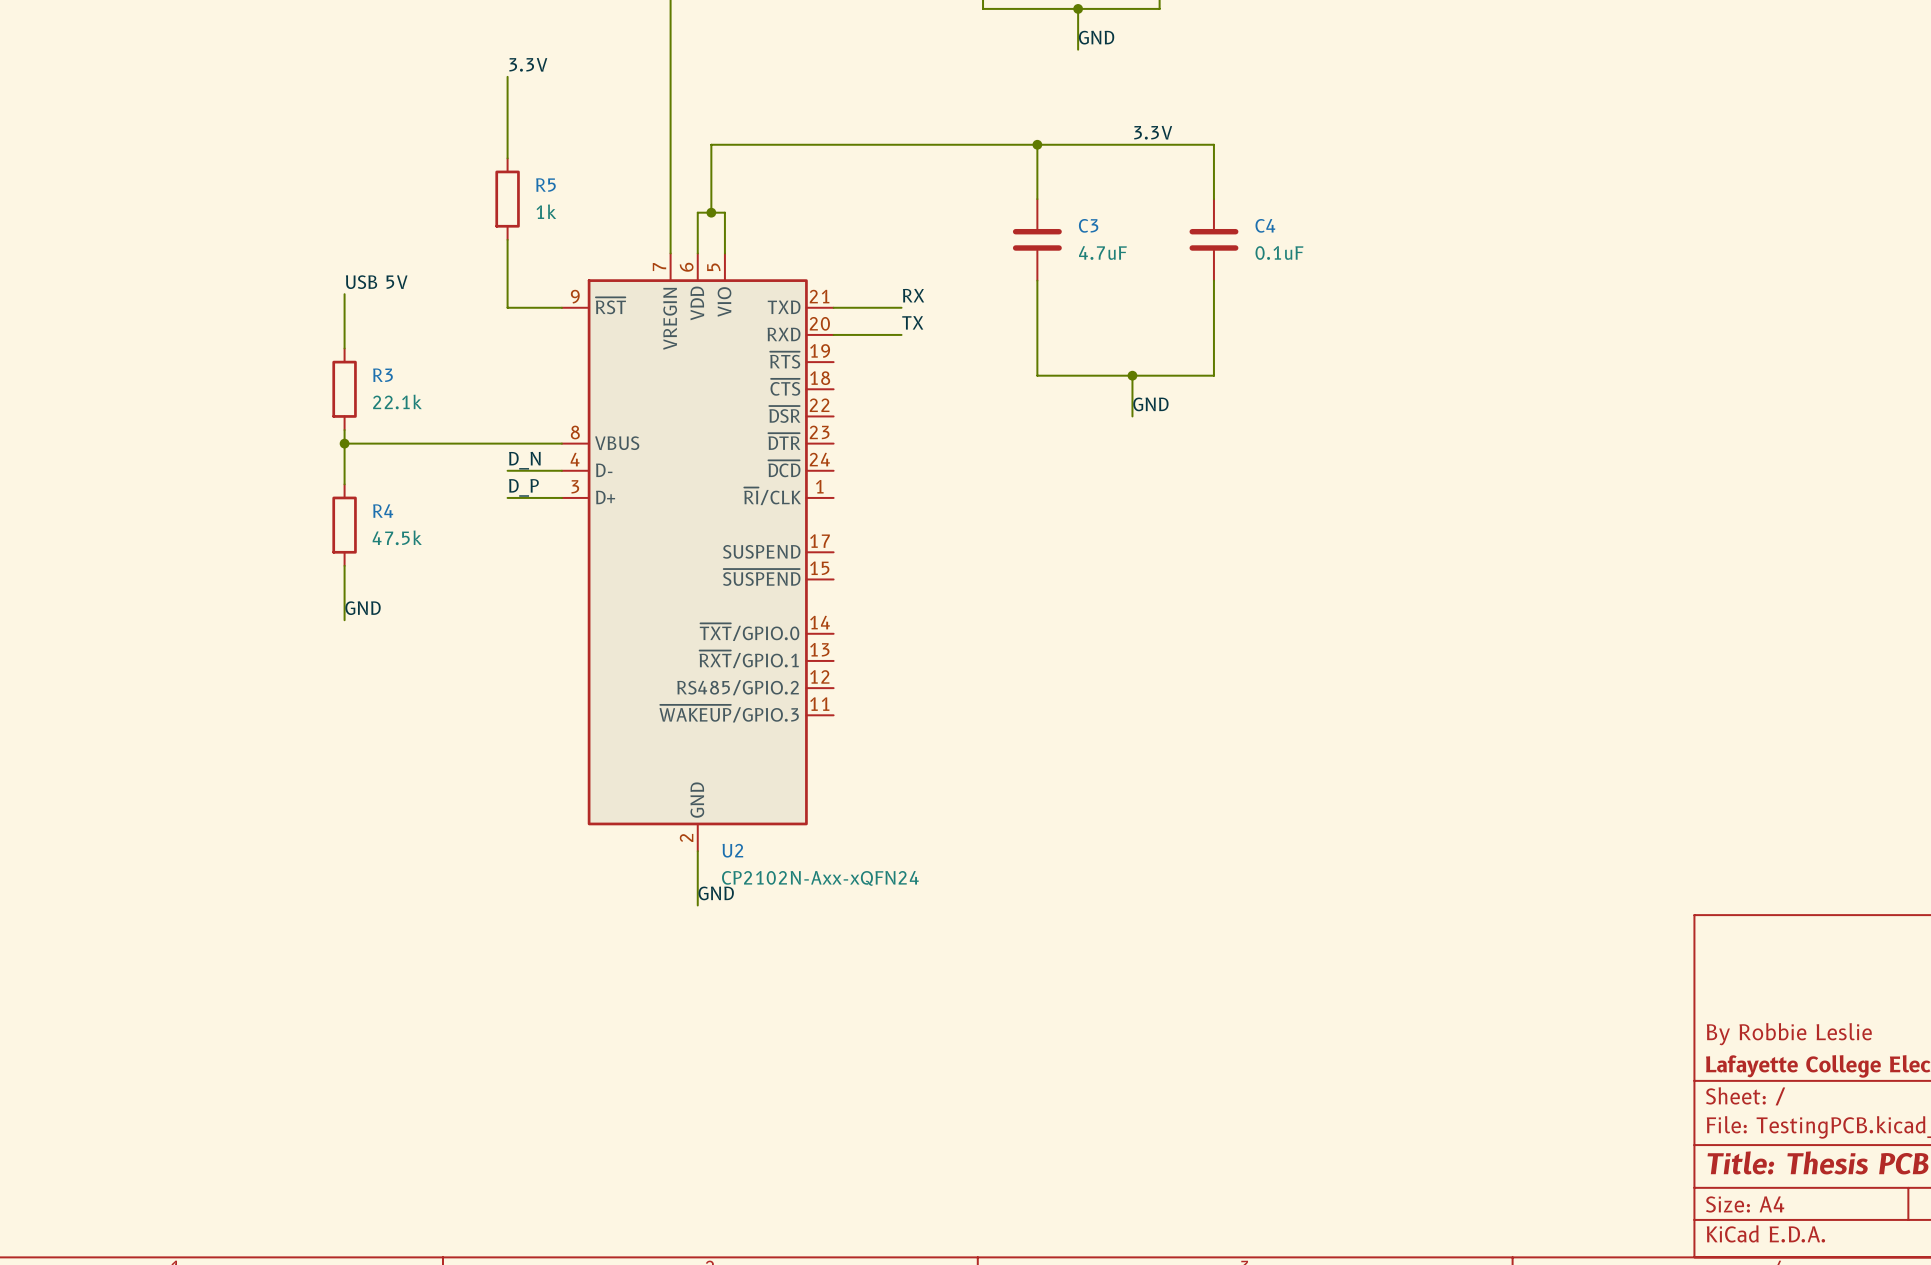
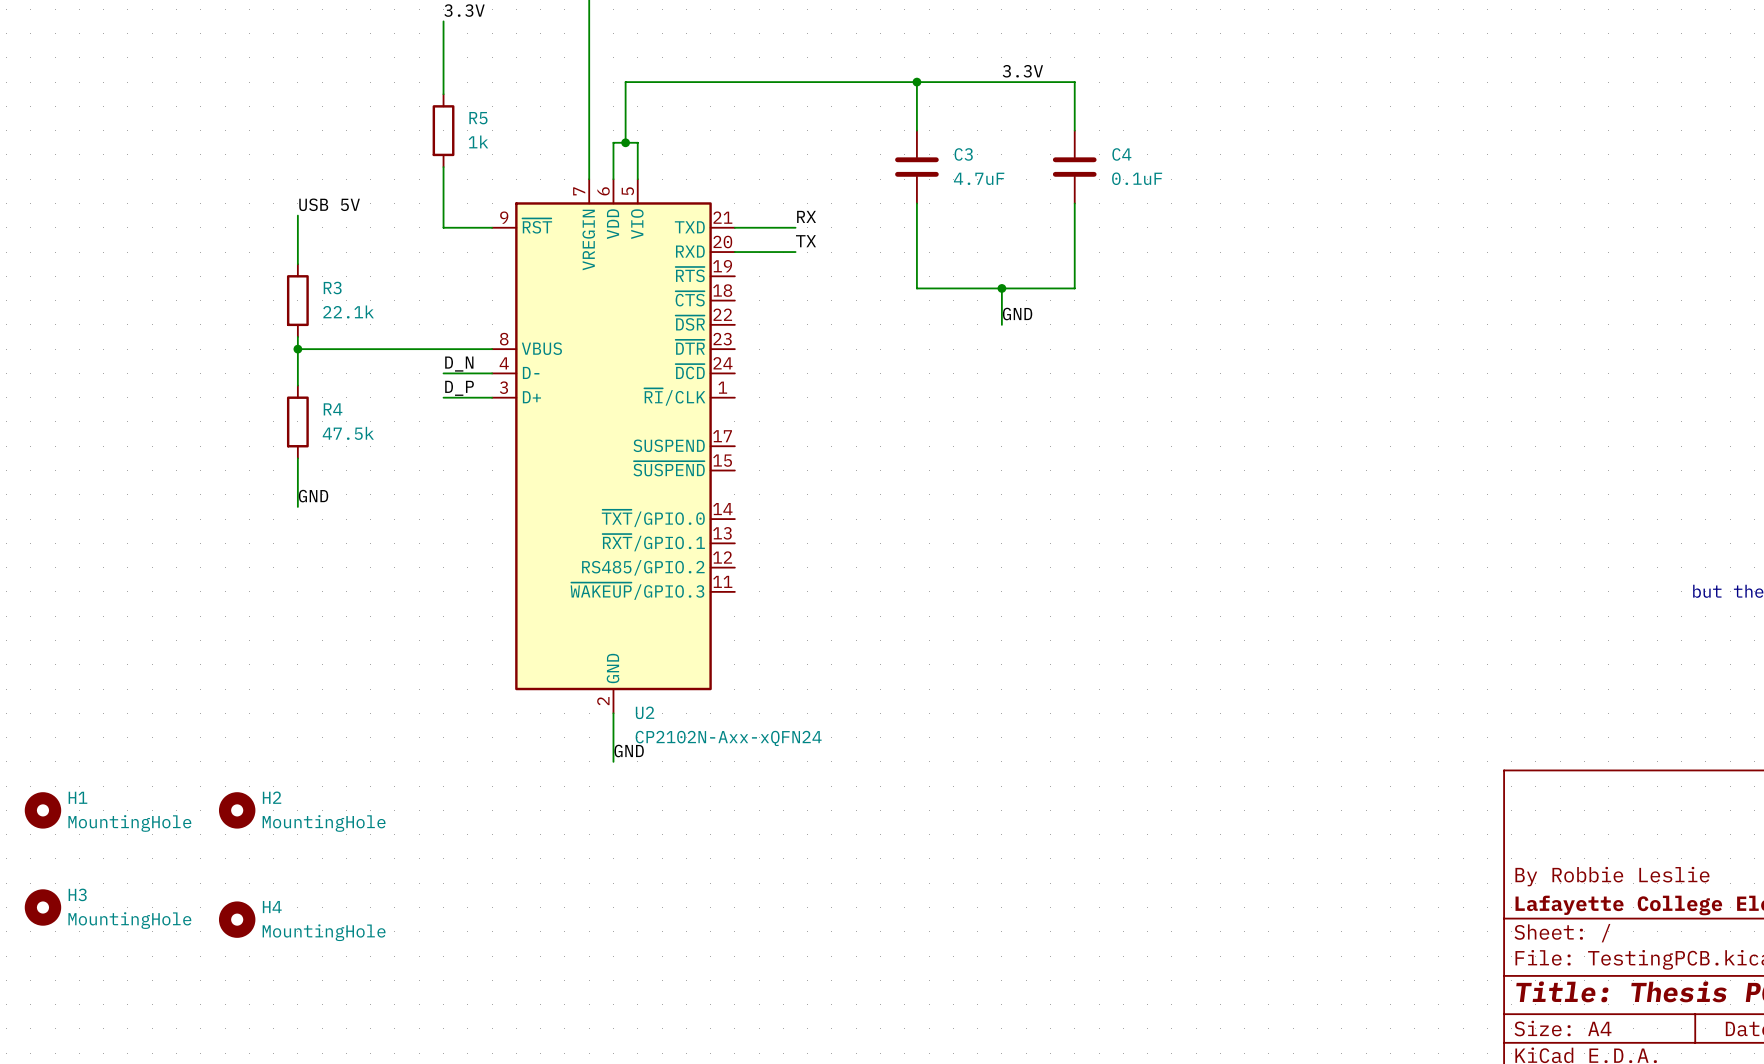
H1: none -> MountingHole (42, 810)
H2: none -> MountingHole (237, 810)
H3: none -> MountingHole (42, 907)
H4: none -> MountingHole (237, 919)

